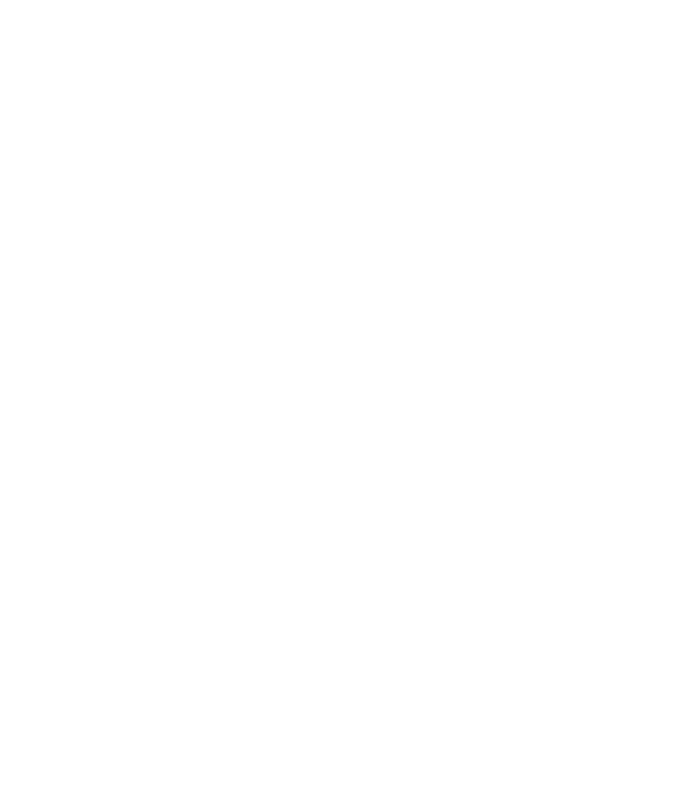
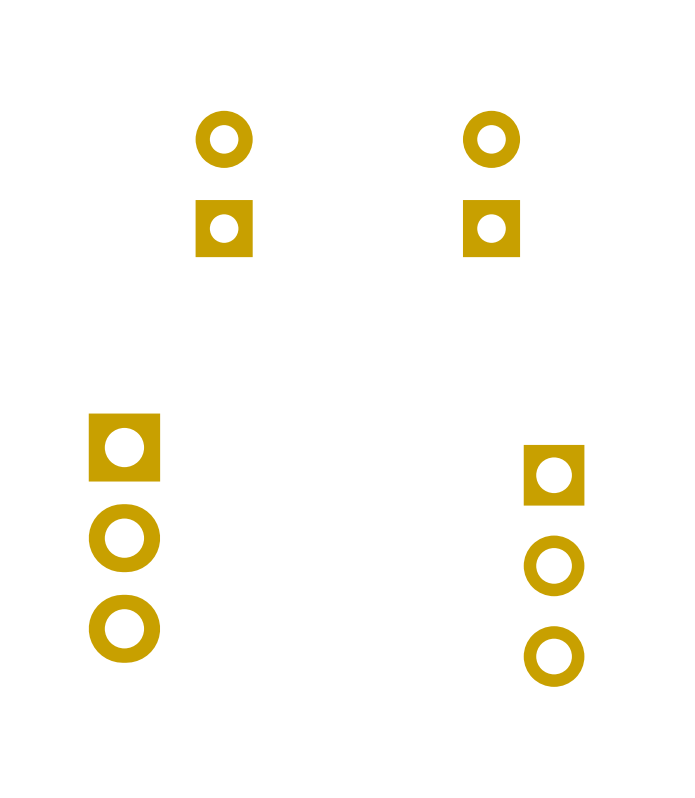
part: none -> (224, 183)
part: none -> (491, 183)
part: none -> (124, 538)
part: none -> (554, 565)

